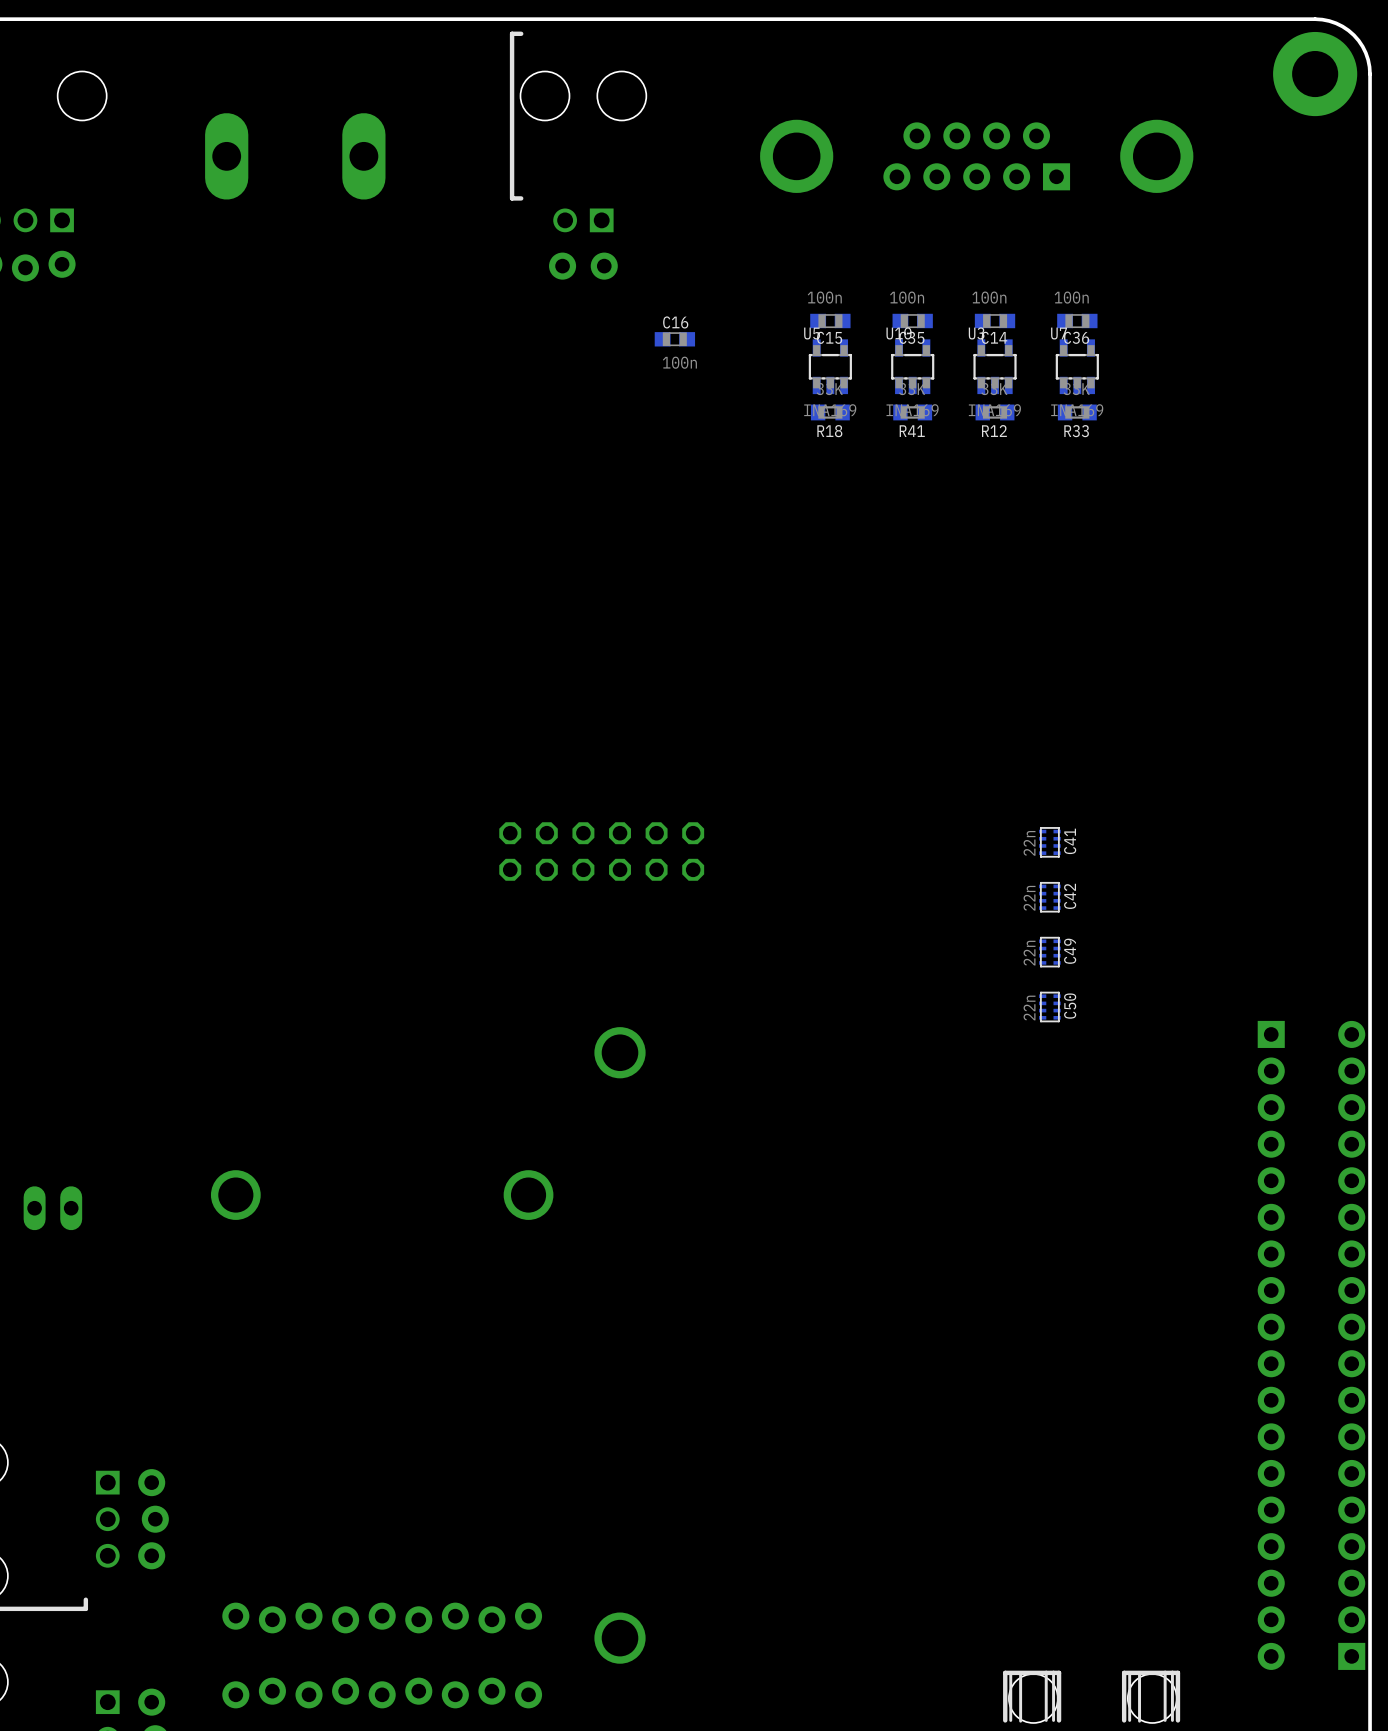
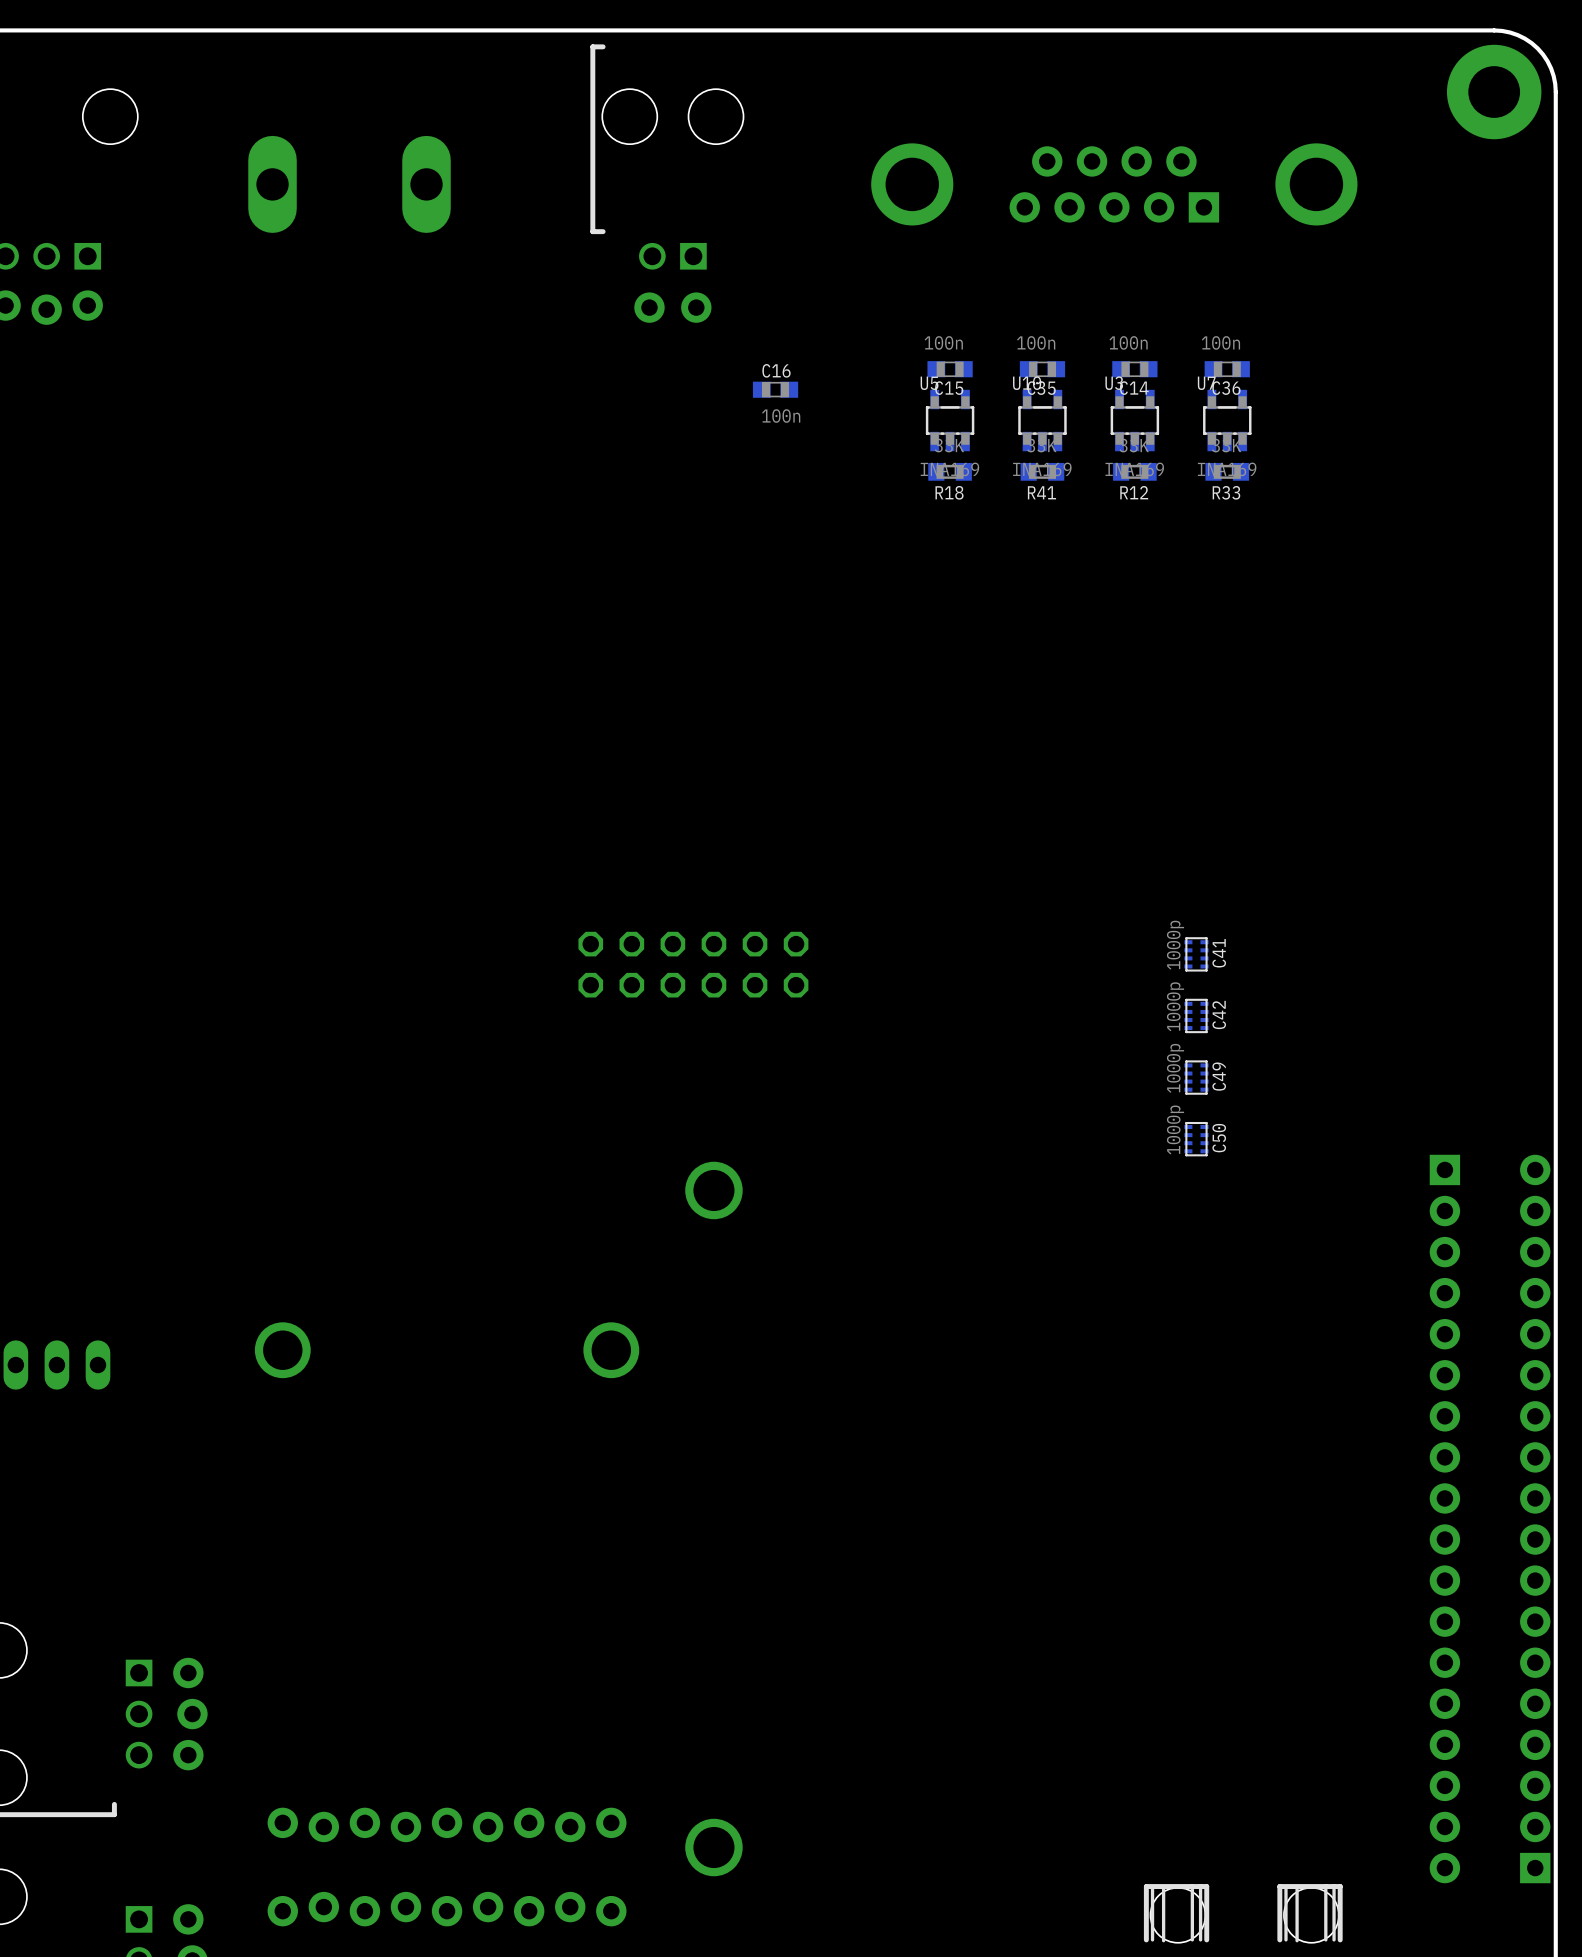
C41 value: 22n (1029, 843) -> 1000p (1175, 945)
C42 value: 22n (1029, 898) -> 1000p (1175, 1006)
C49 value: 22n (1029, 953) -> 1000p (1175, 1068)
C50 value: 22n (1029, 1008) -> 1000p (1175, 1129)

